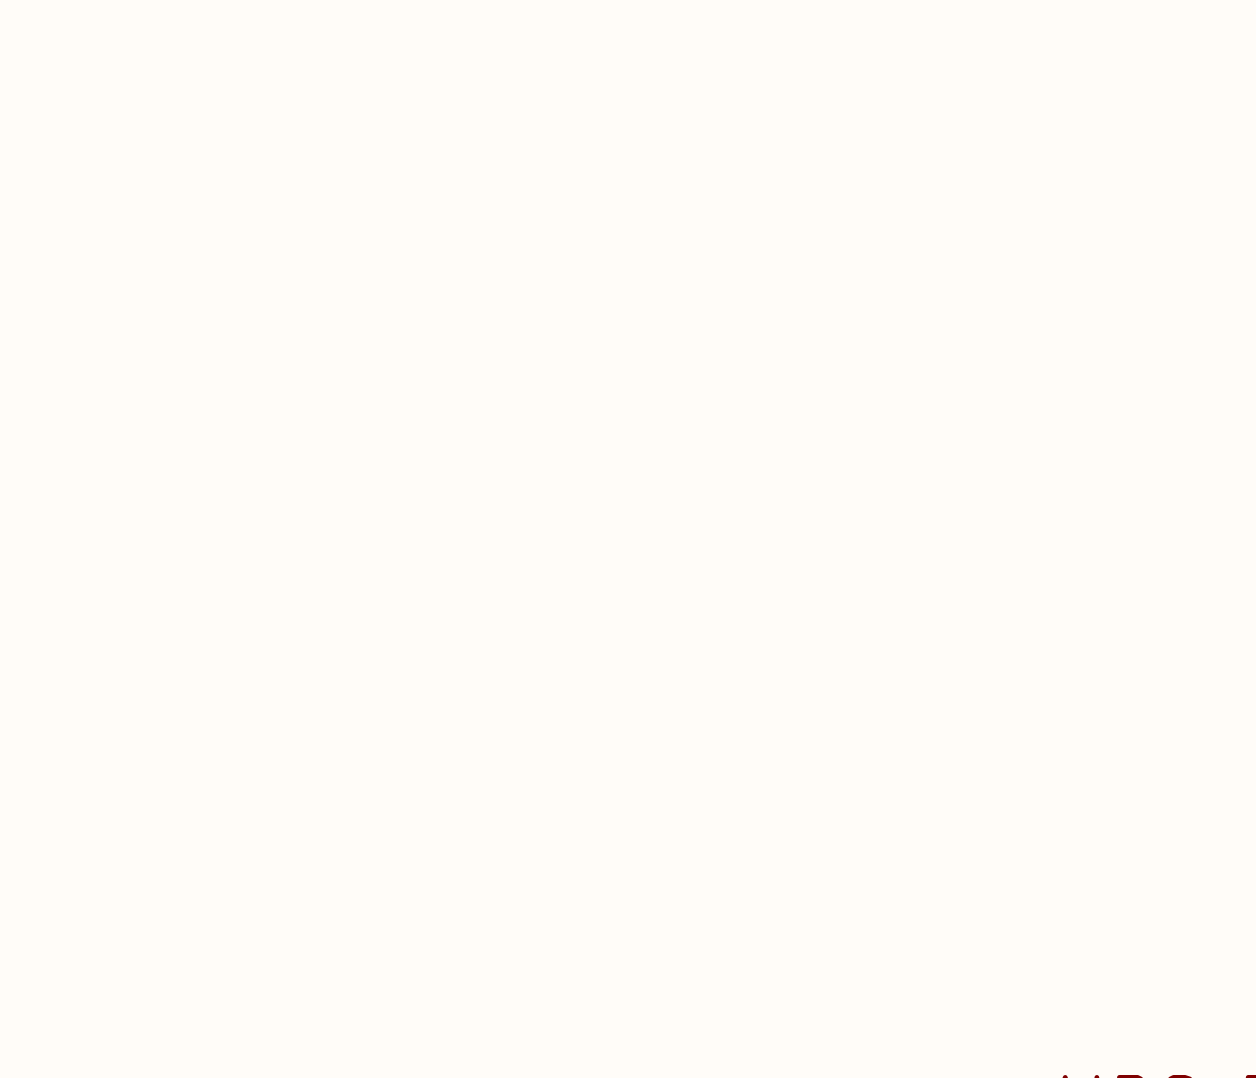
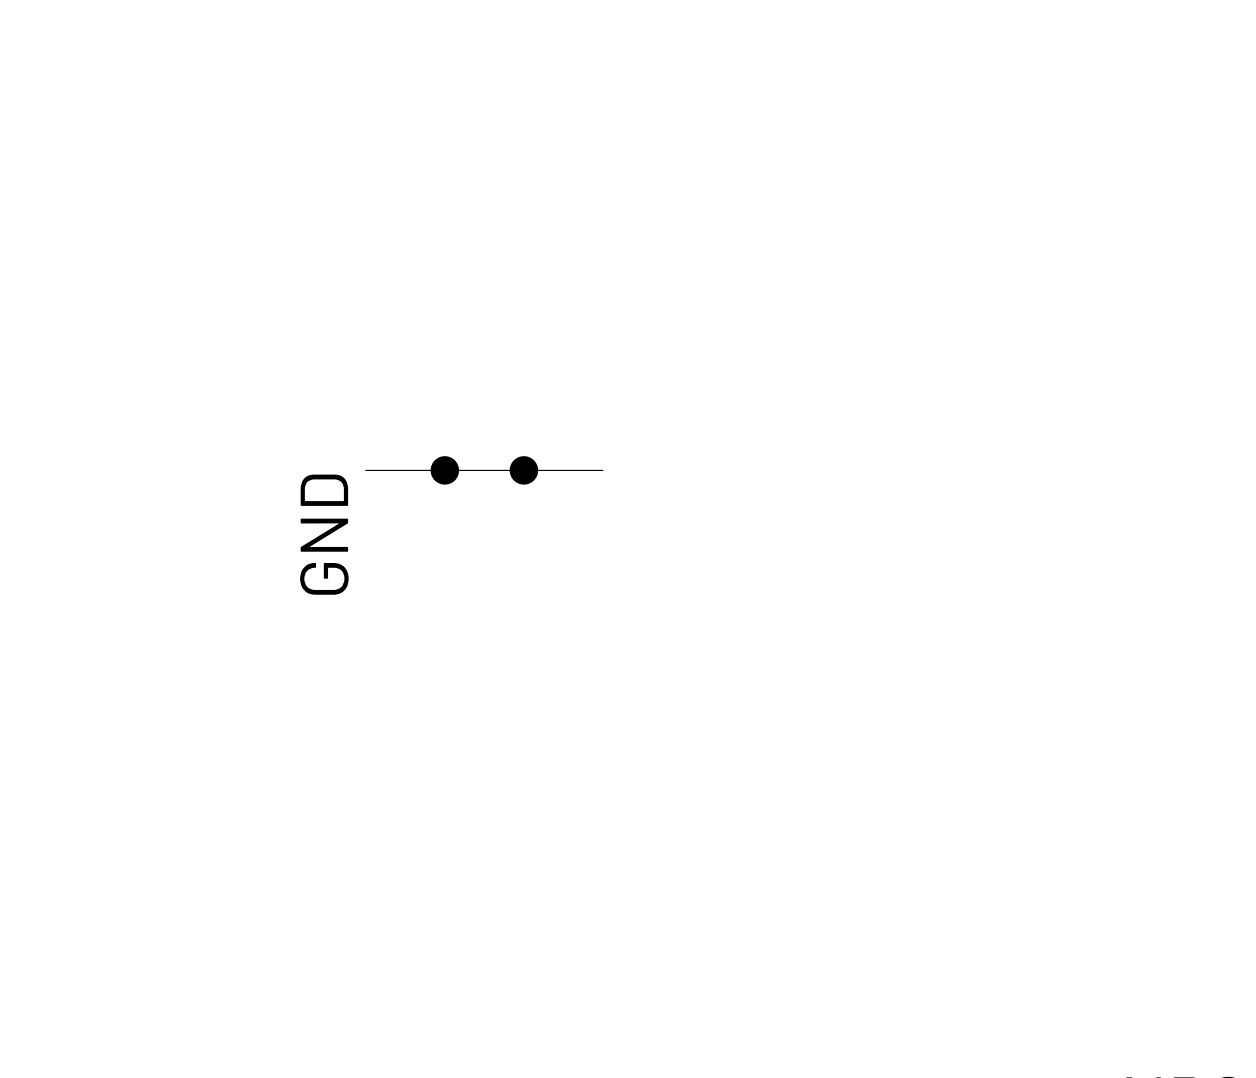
wire: none -> (365, 470) (602, 470)
junction: none -> (444, 470)
junction: none -> (523, 470)
label: none -> GND (324, 534)

